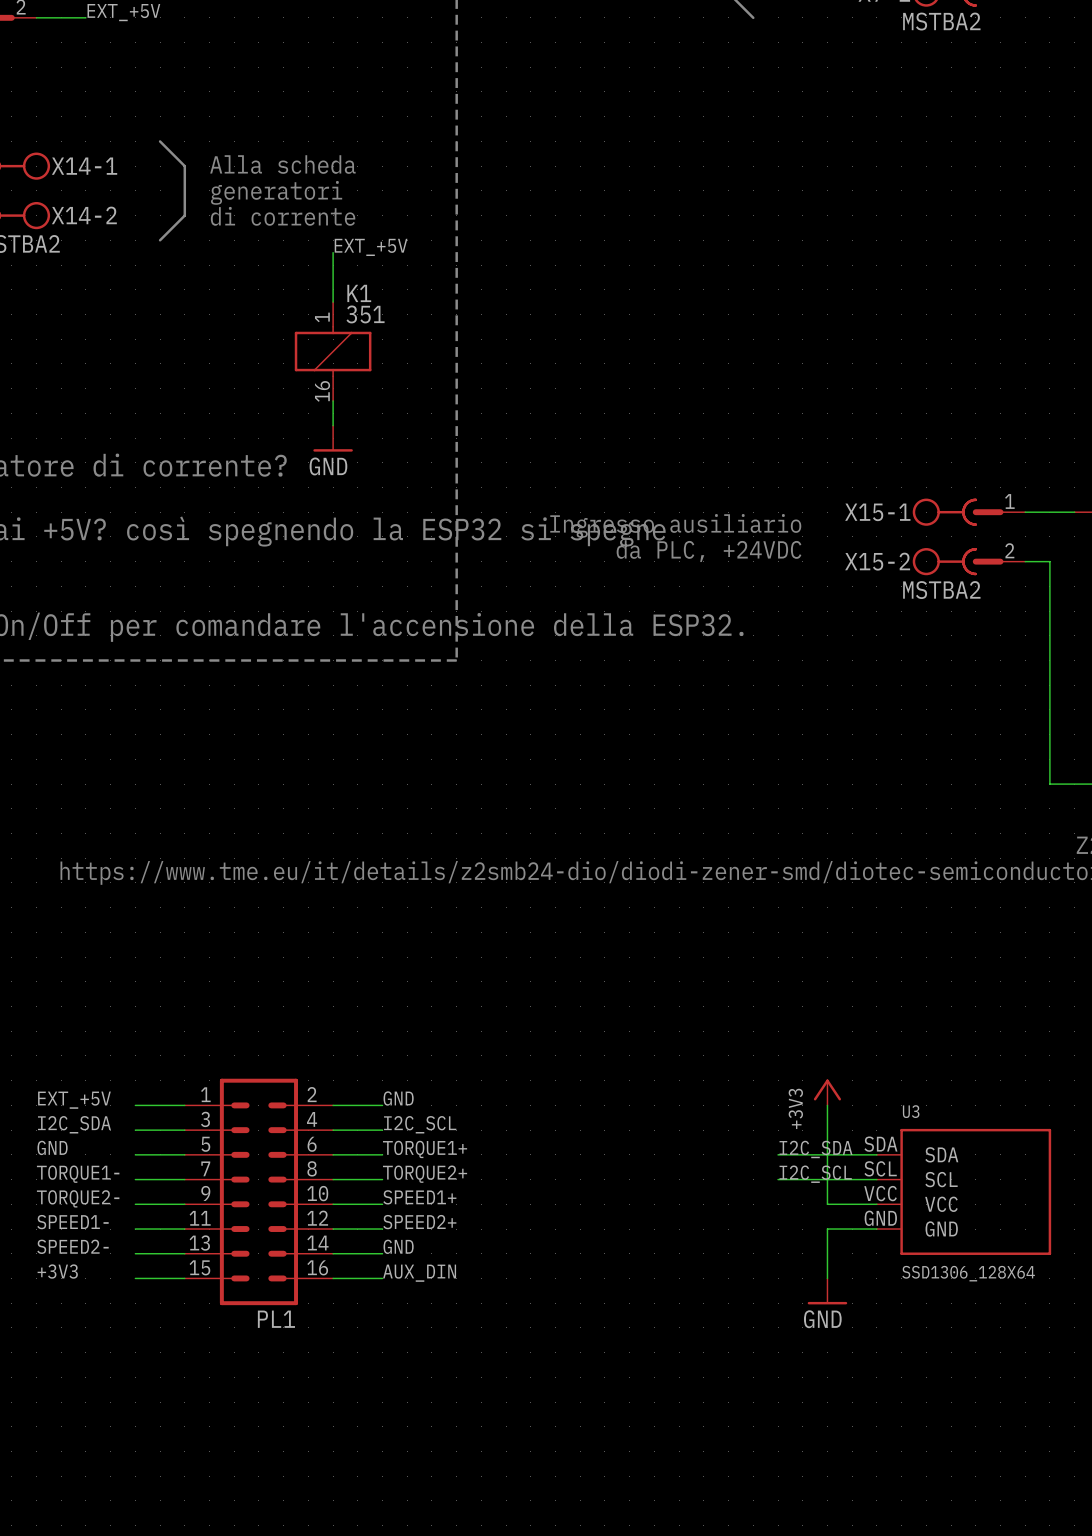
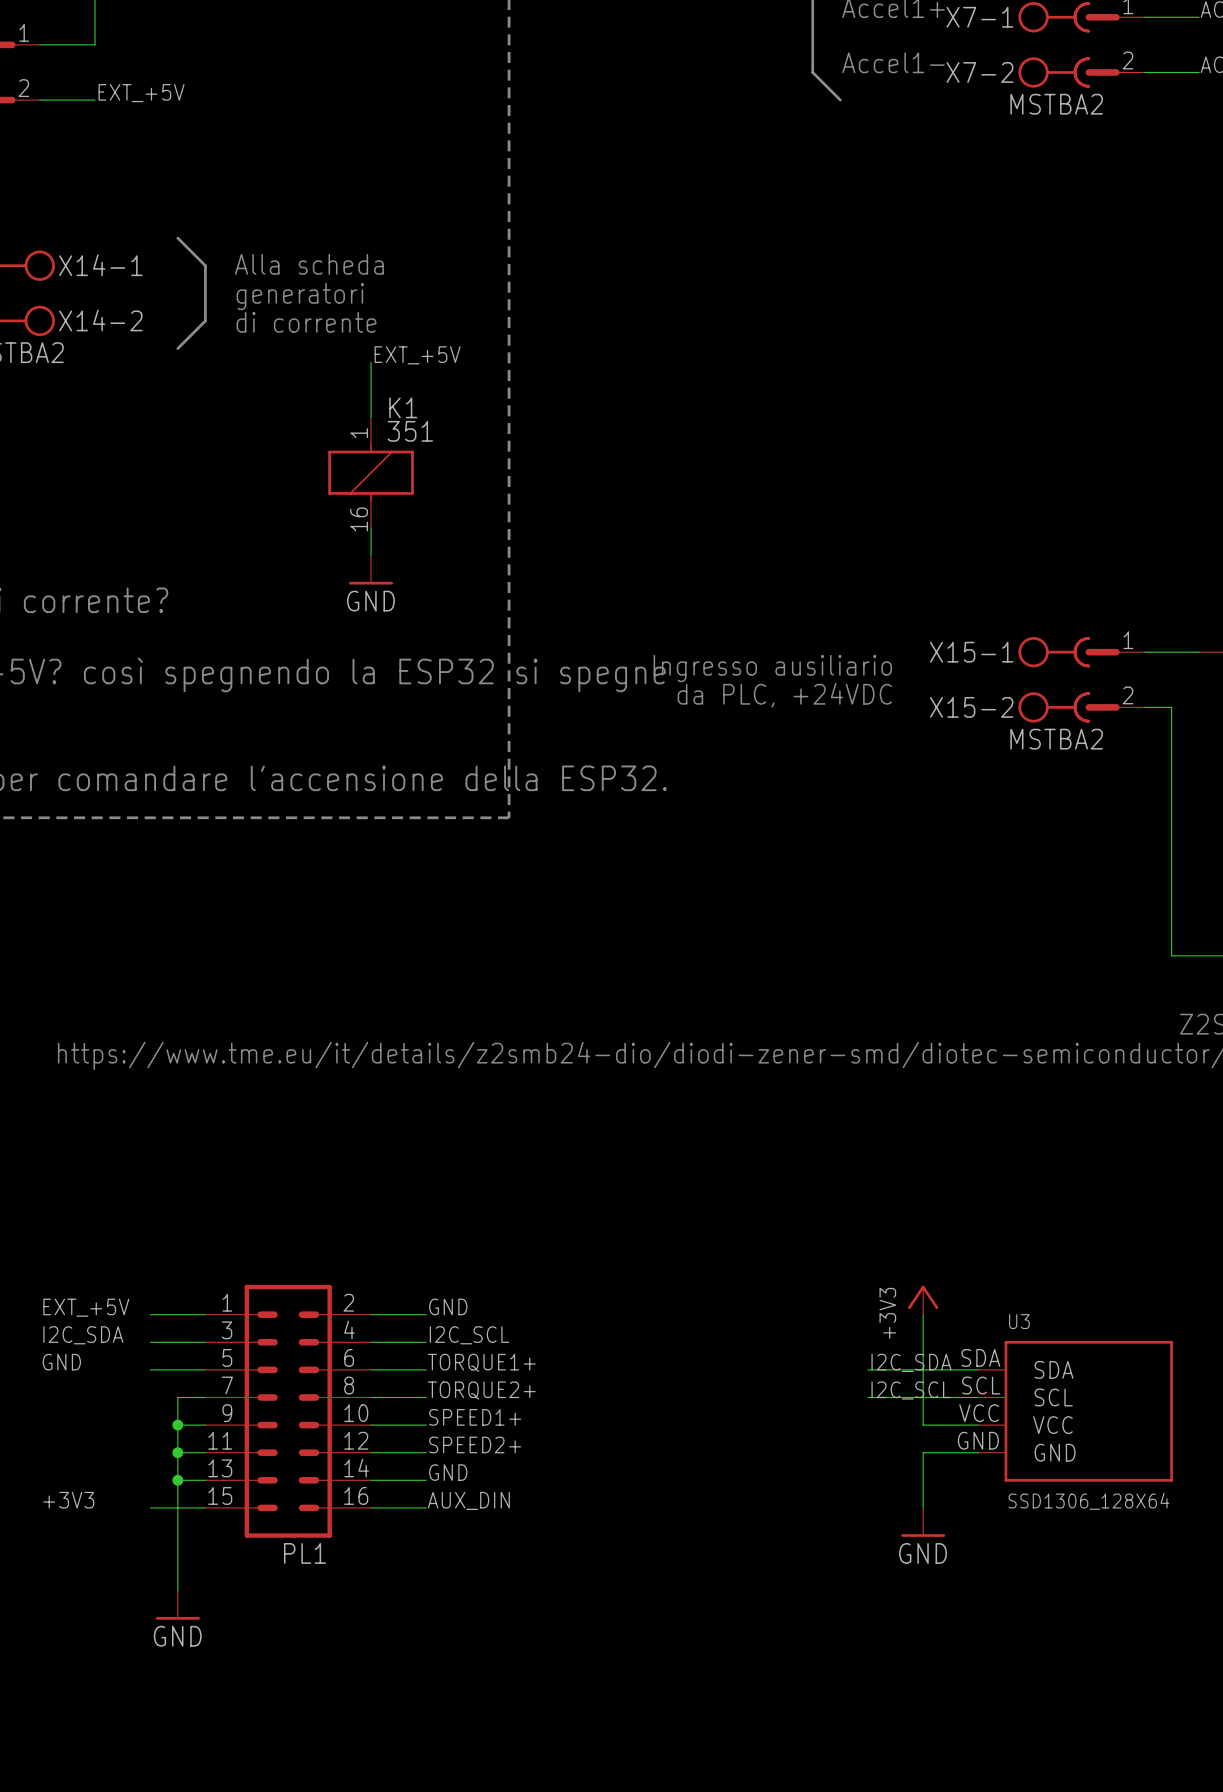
label: TORQUE1- (78, 1174) -> none
wire: (135, 1179) (160, 1179) -> (177, 1590) (177, 1397)
label: TORQUE2- (78, 1198) -> none
wire: (135, 1204) (160, 1204) -> none
junction: none -> (177, 1425)
label: SPEED1- (72, 1222) -> none
wire: (135, 1229) (160, 1229) -> none
junction: none -> (177, 1452)
label: SPEED2- (72, 1246) -> none
wire: (135, 1253) (160, 1253) -> none
junction: none -> (177, 1480)
power symbol: none -> GND (177, 1605)

